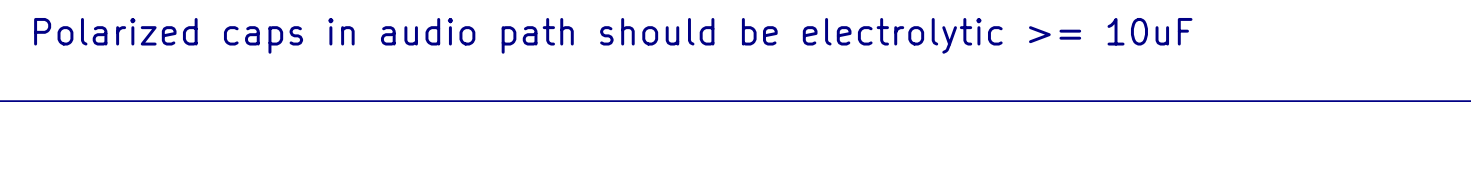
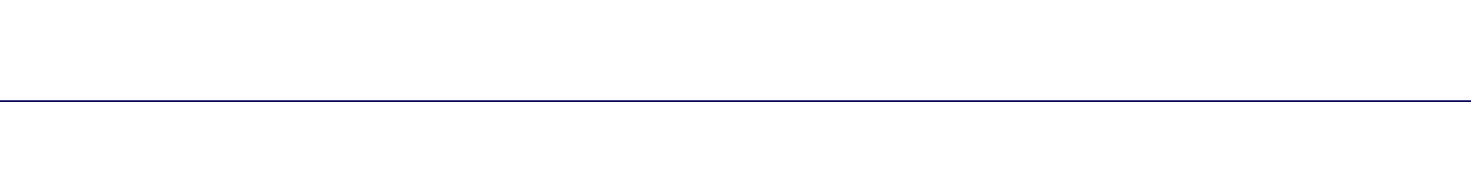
text: Polarized caps in audio path should be electrolytic >= 10uF (613, 35) -> none

